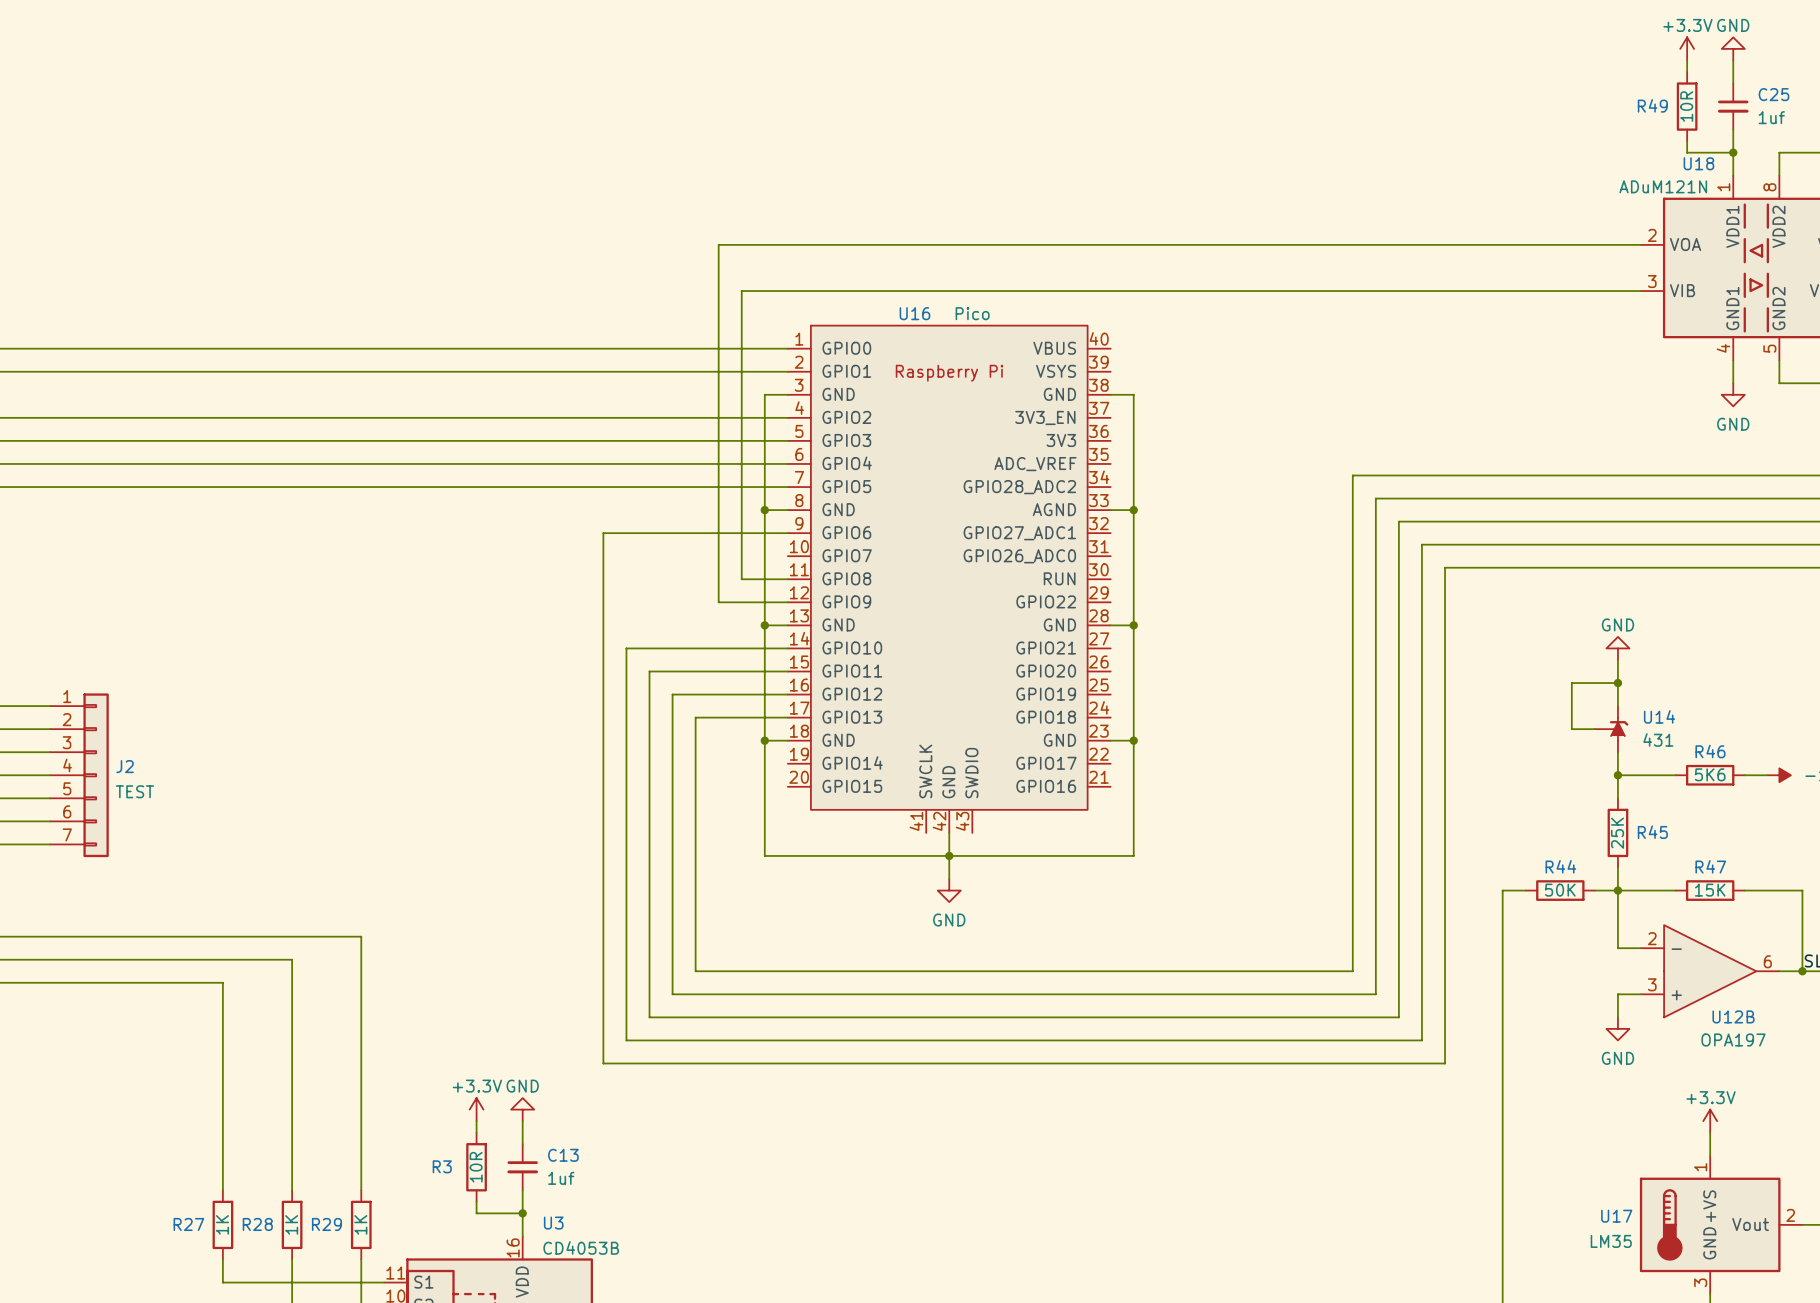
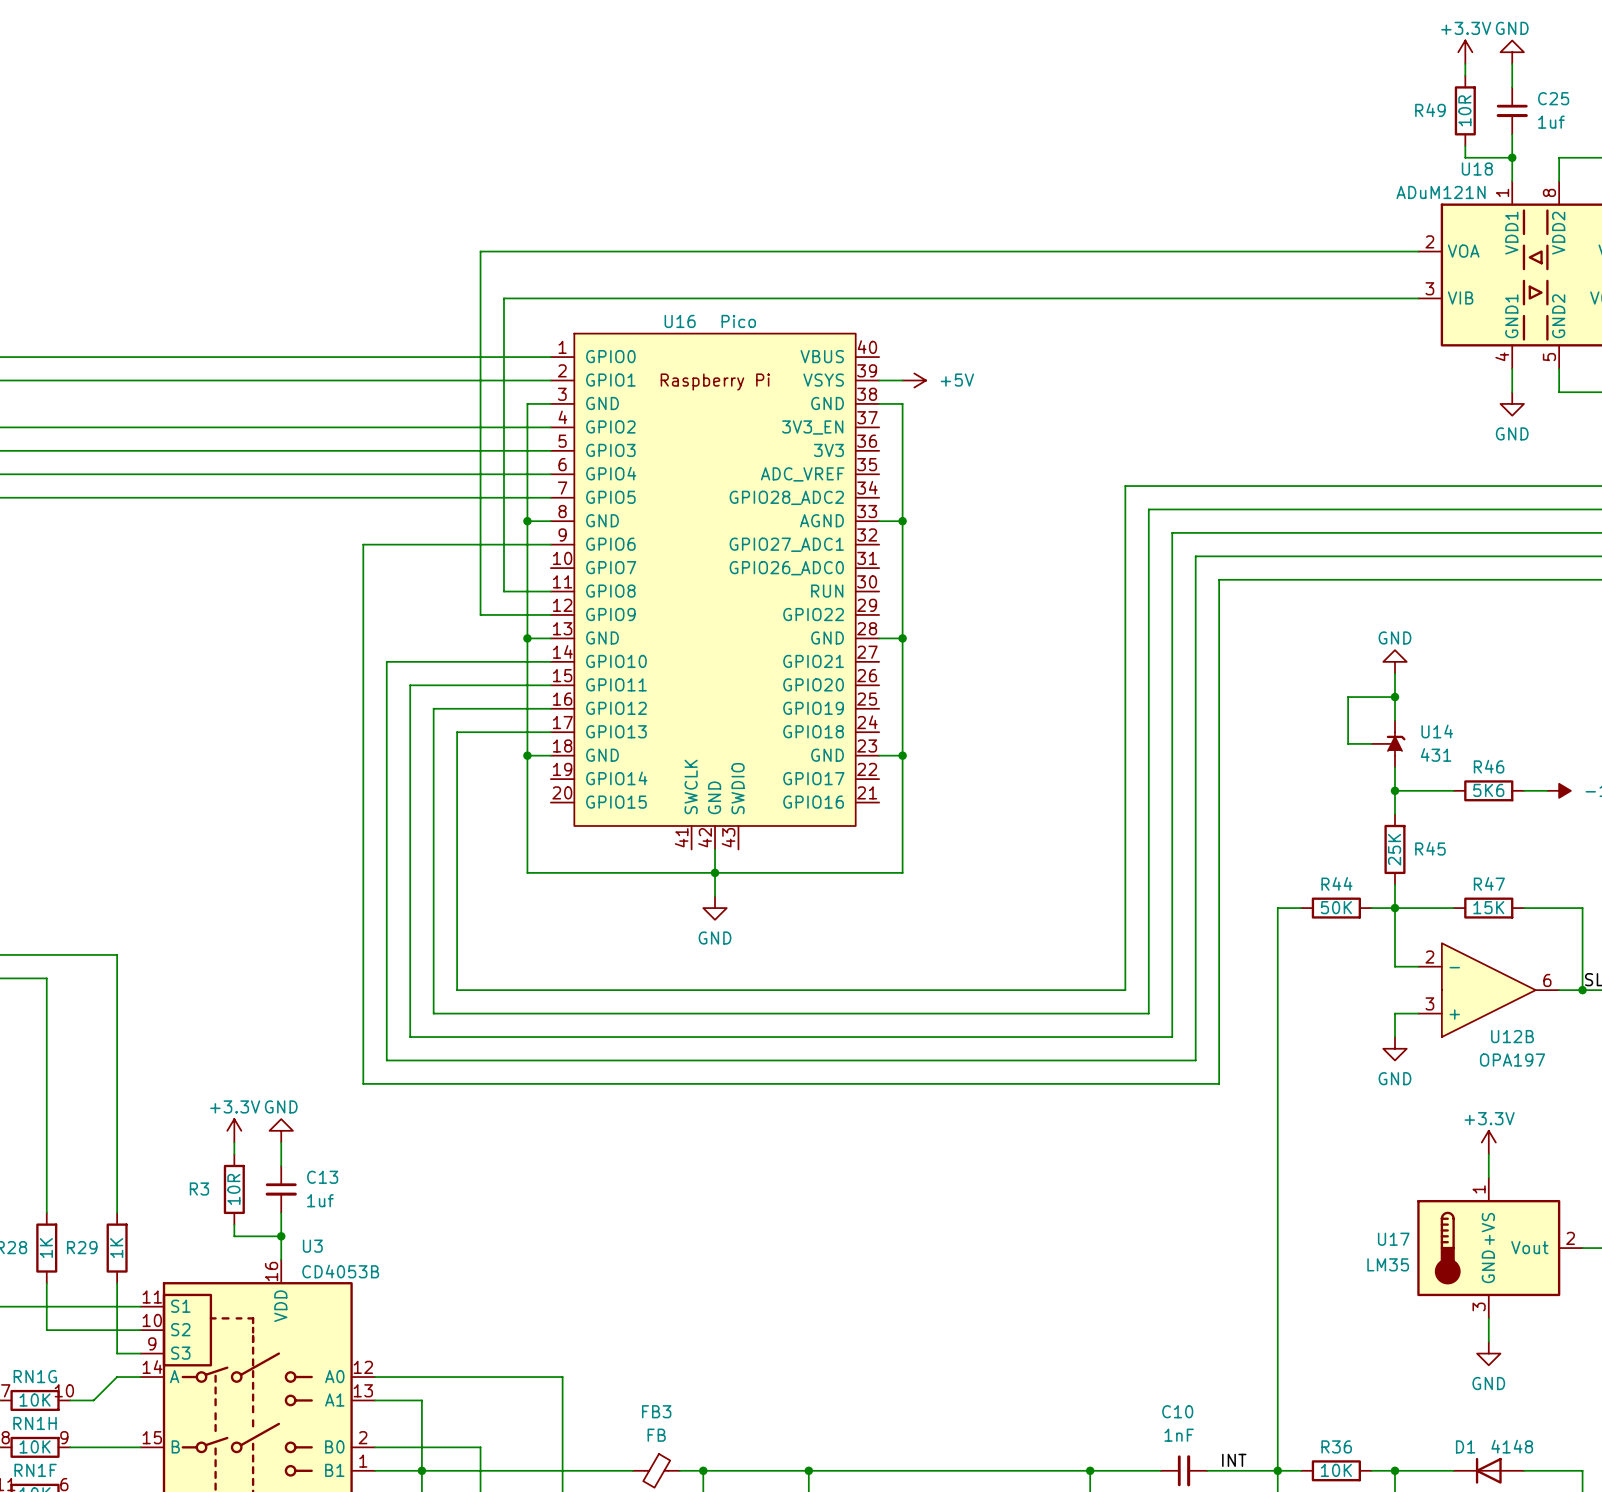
wire: none -> (879, 380) (902, 380)
power symbol: none -> +5V (914, 380)

